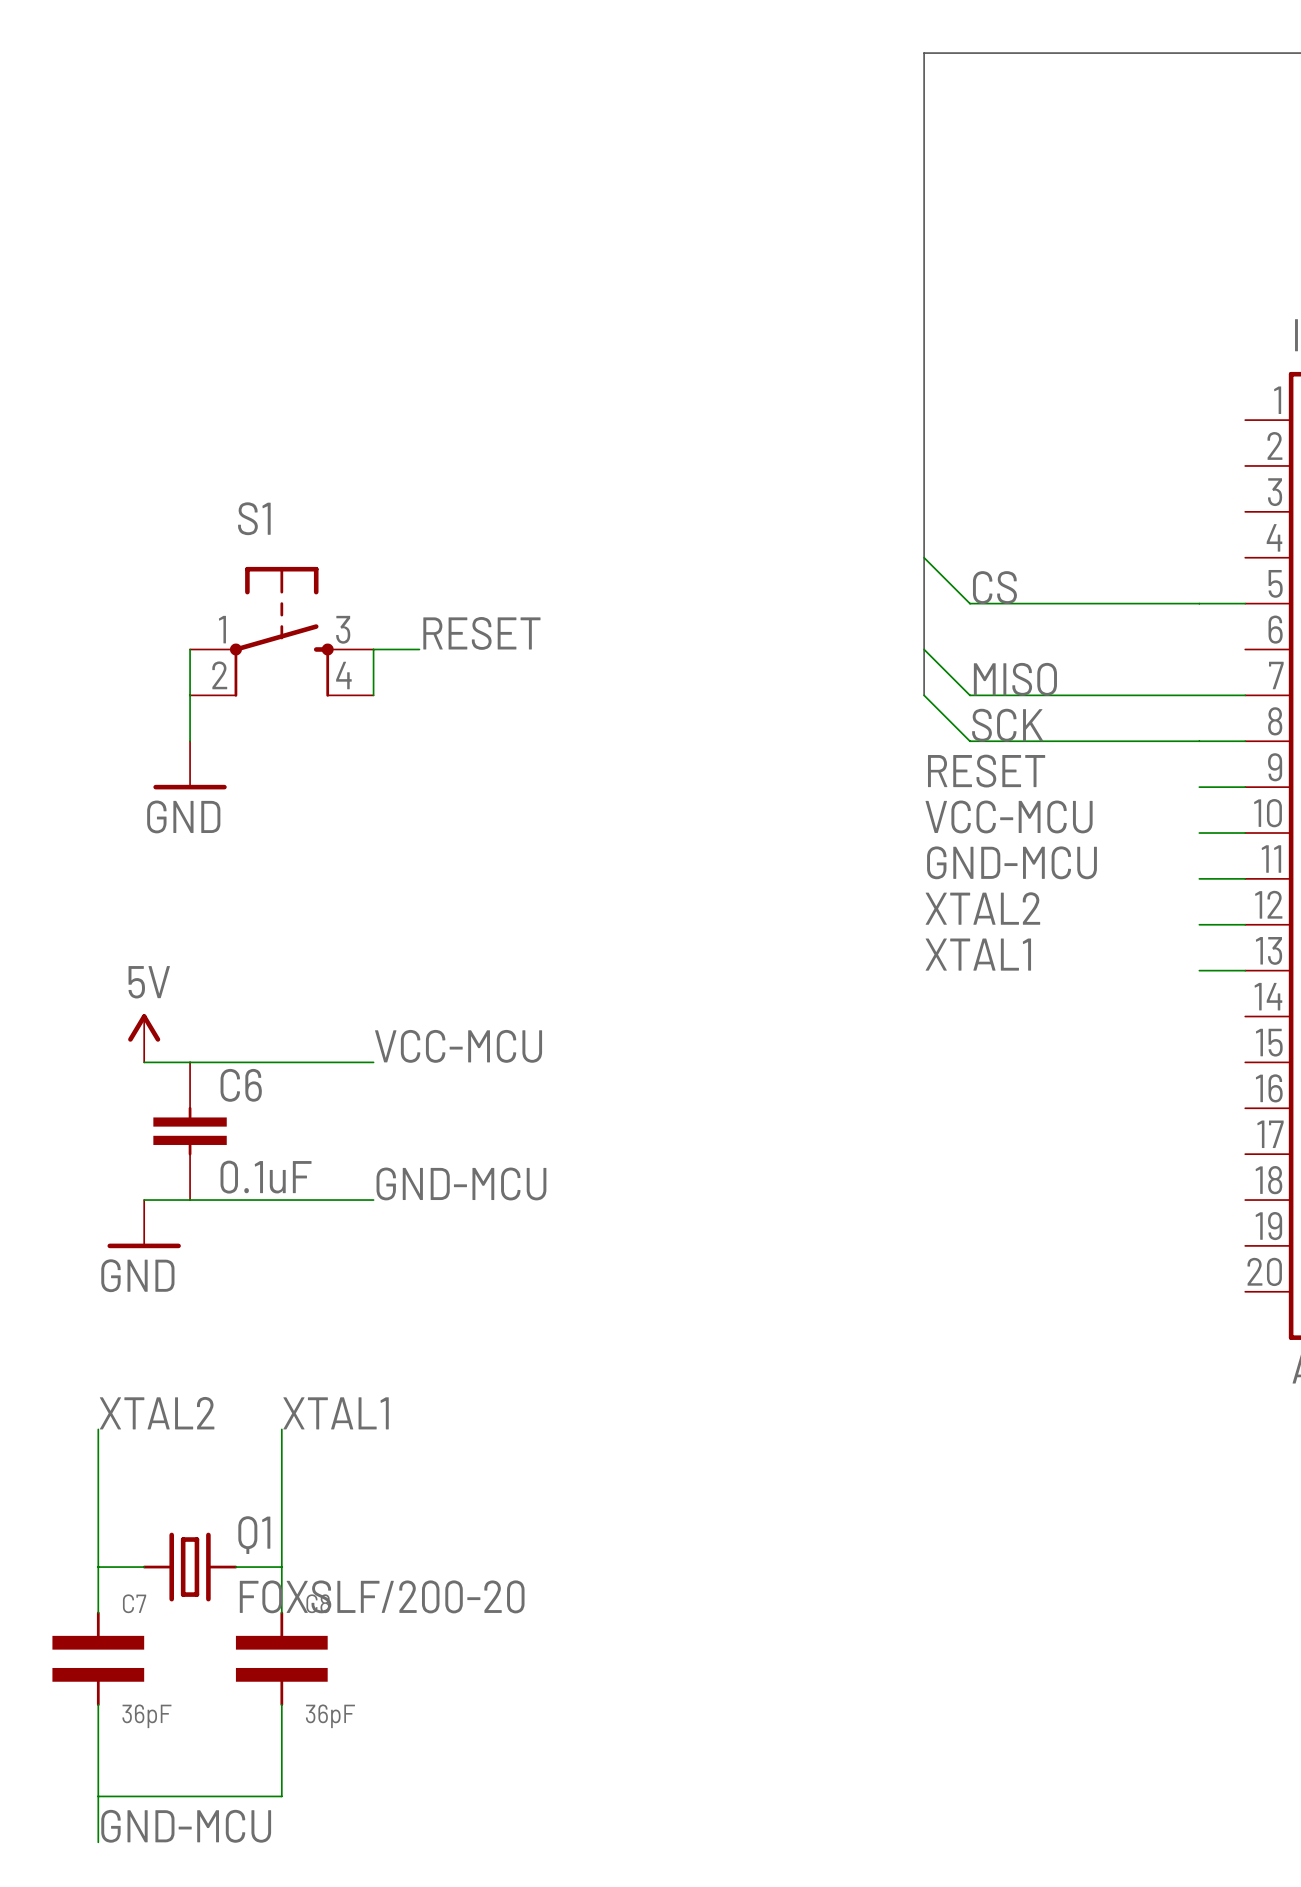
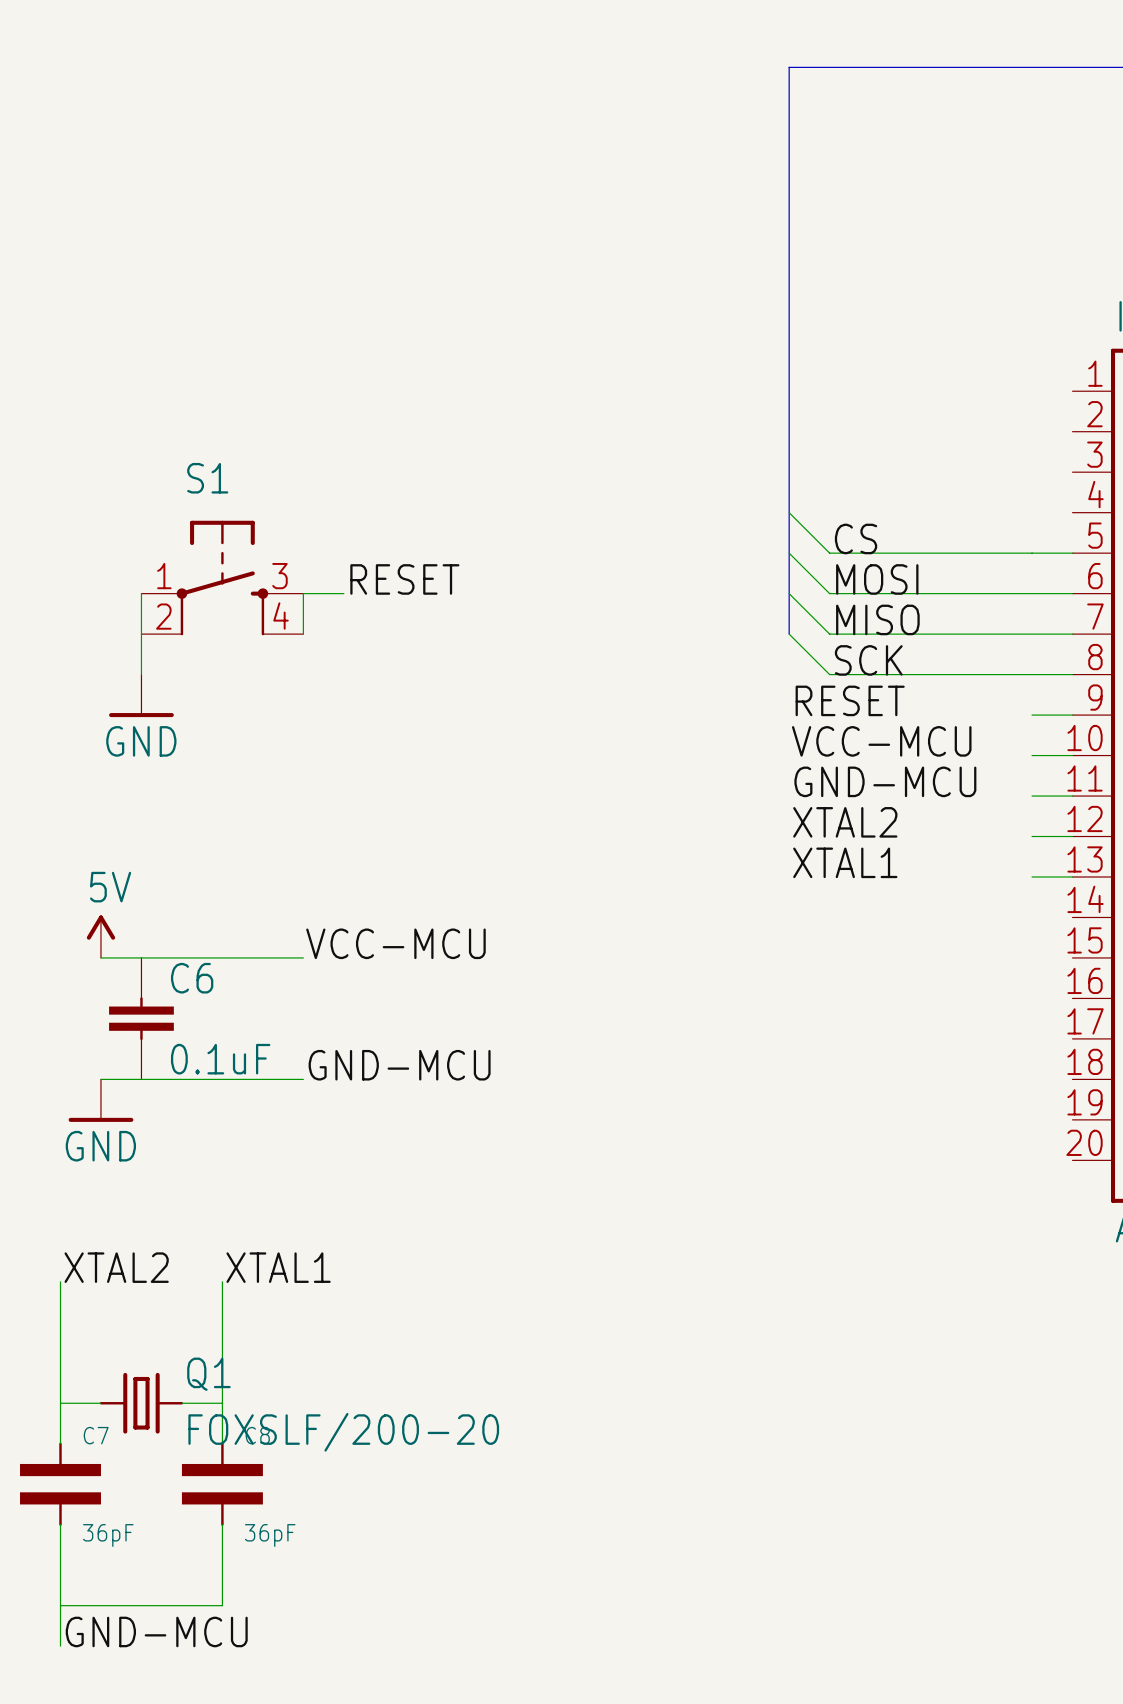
wire: none -> (789, 553) (829, 593) (1072, 593)
label: none -> MOSI (877, 579)

